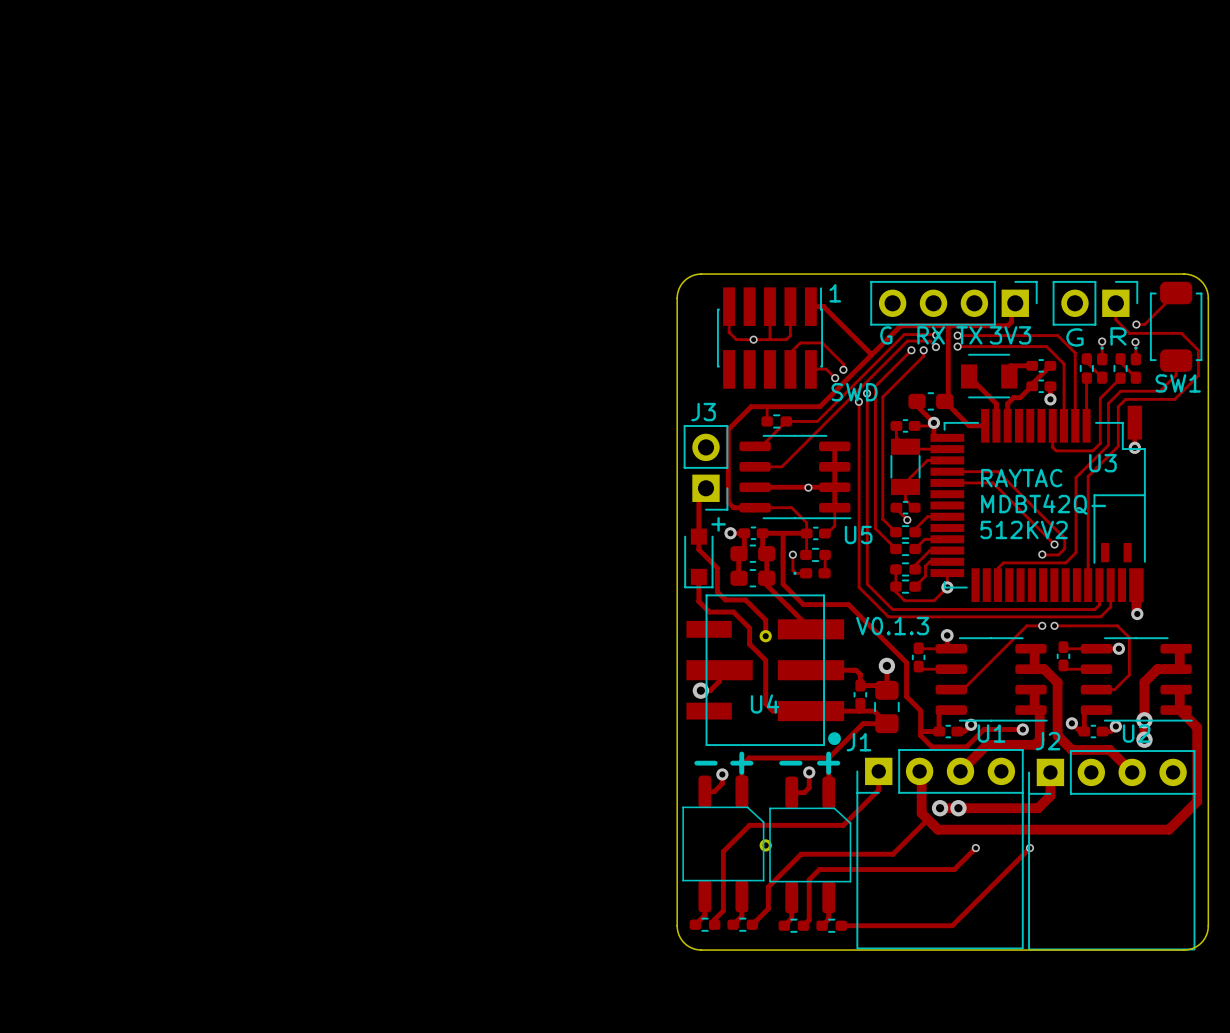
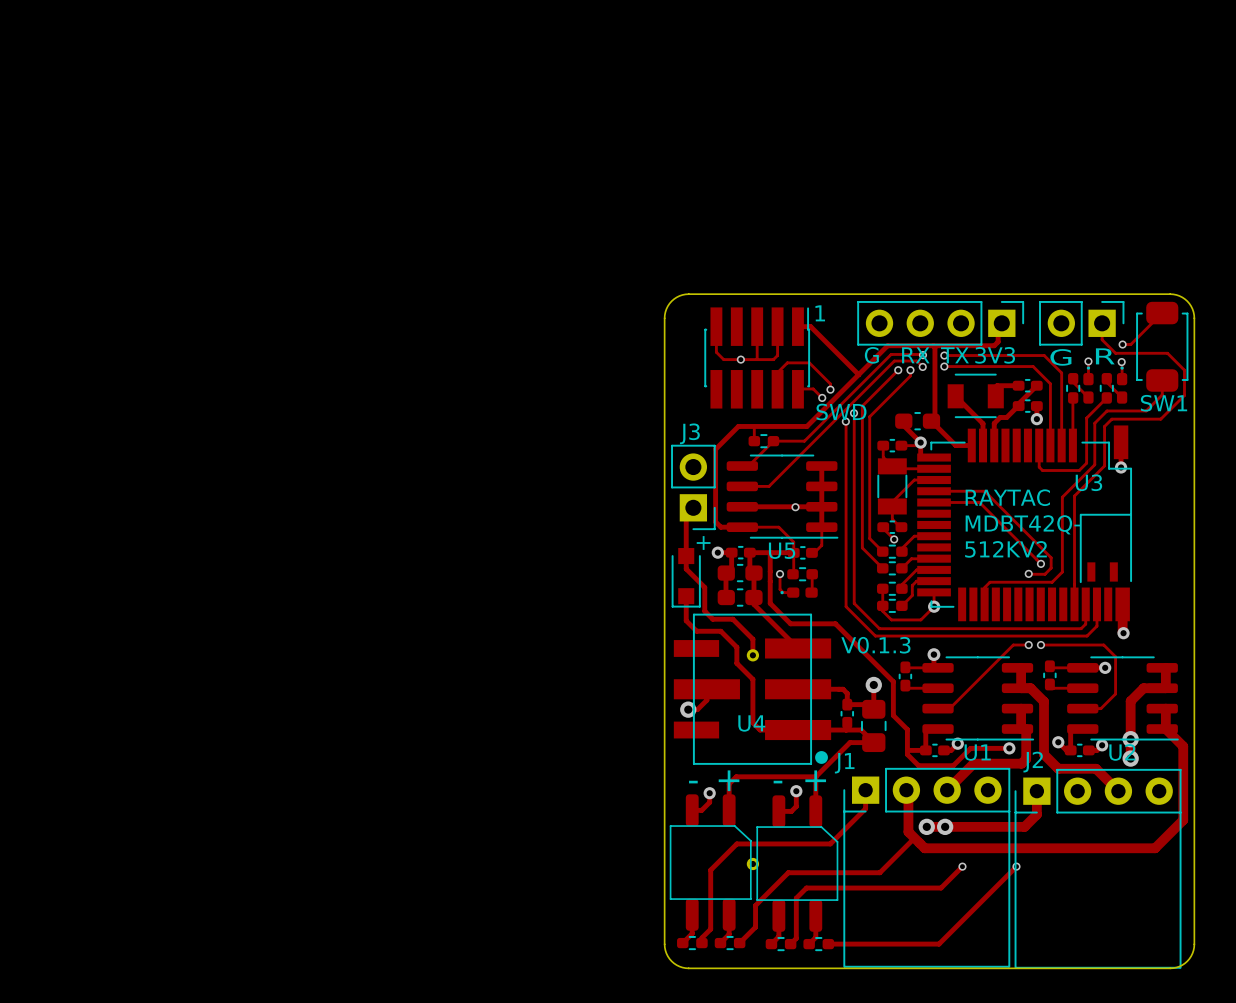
U5 name position: U5 (858, 535) -> U5 (782, 550)

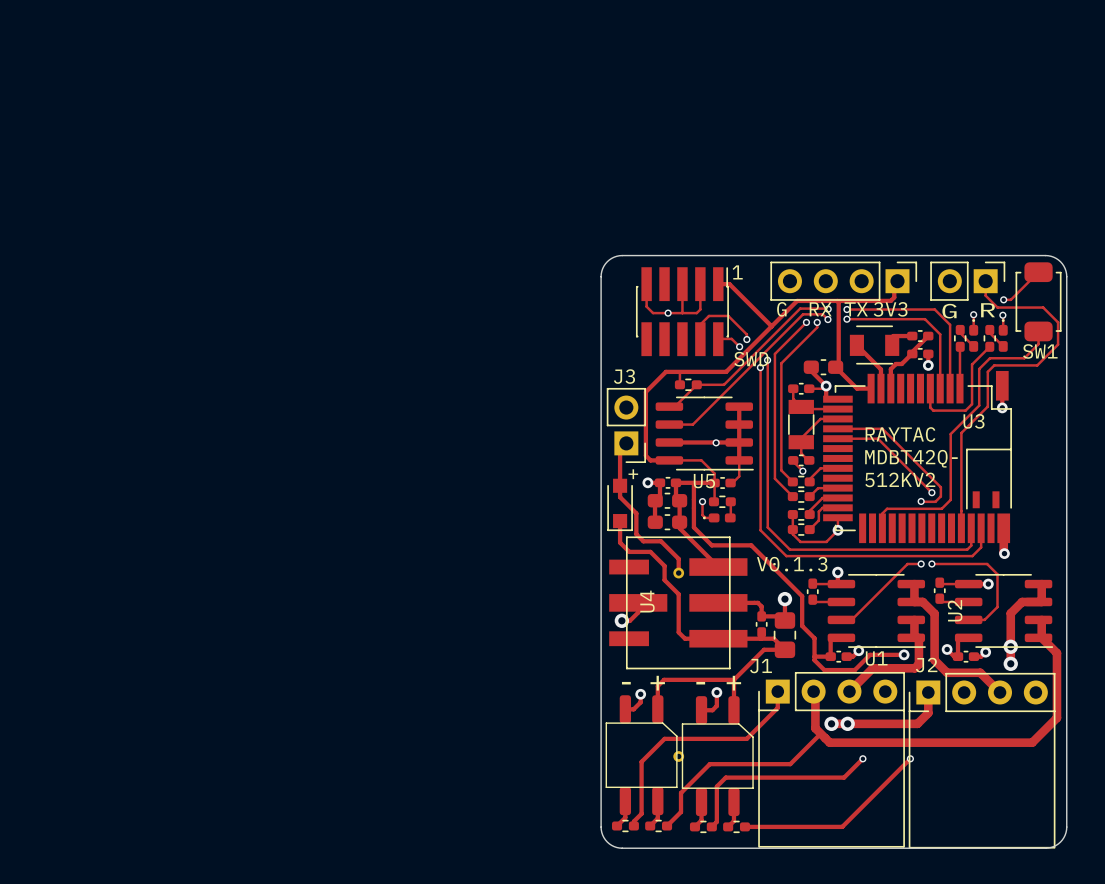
U4 footprint: [673, 613, 832, 765] -> [609, 536, 748, 670]
U4 name rotation: 0° (751, 723) -> 90° counterclockwise (647, 601)
U4 name position: U4 (751, 723) -> U4 (647, 601)
U2 name rotation: 0° (1122, 752) -> 90° counterclockwise (955, 610)
U2 name position: U2 (1122, 752) -> U2 (955, 610)

